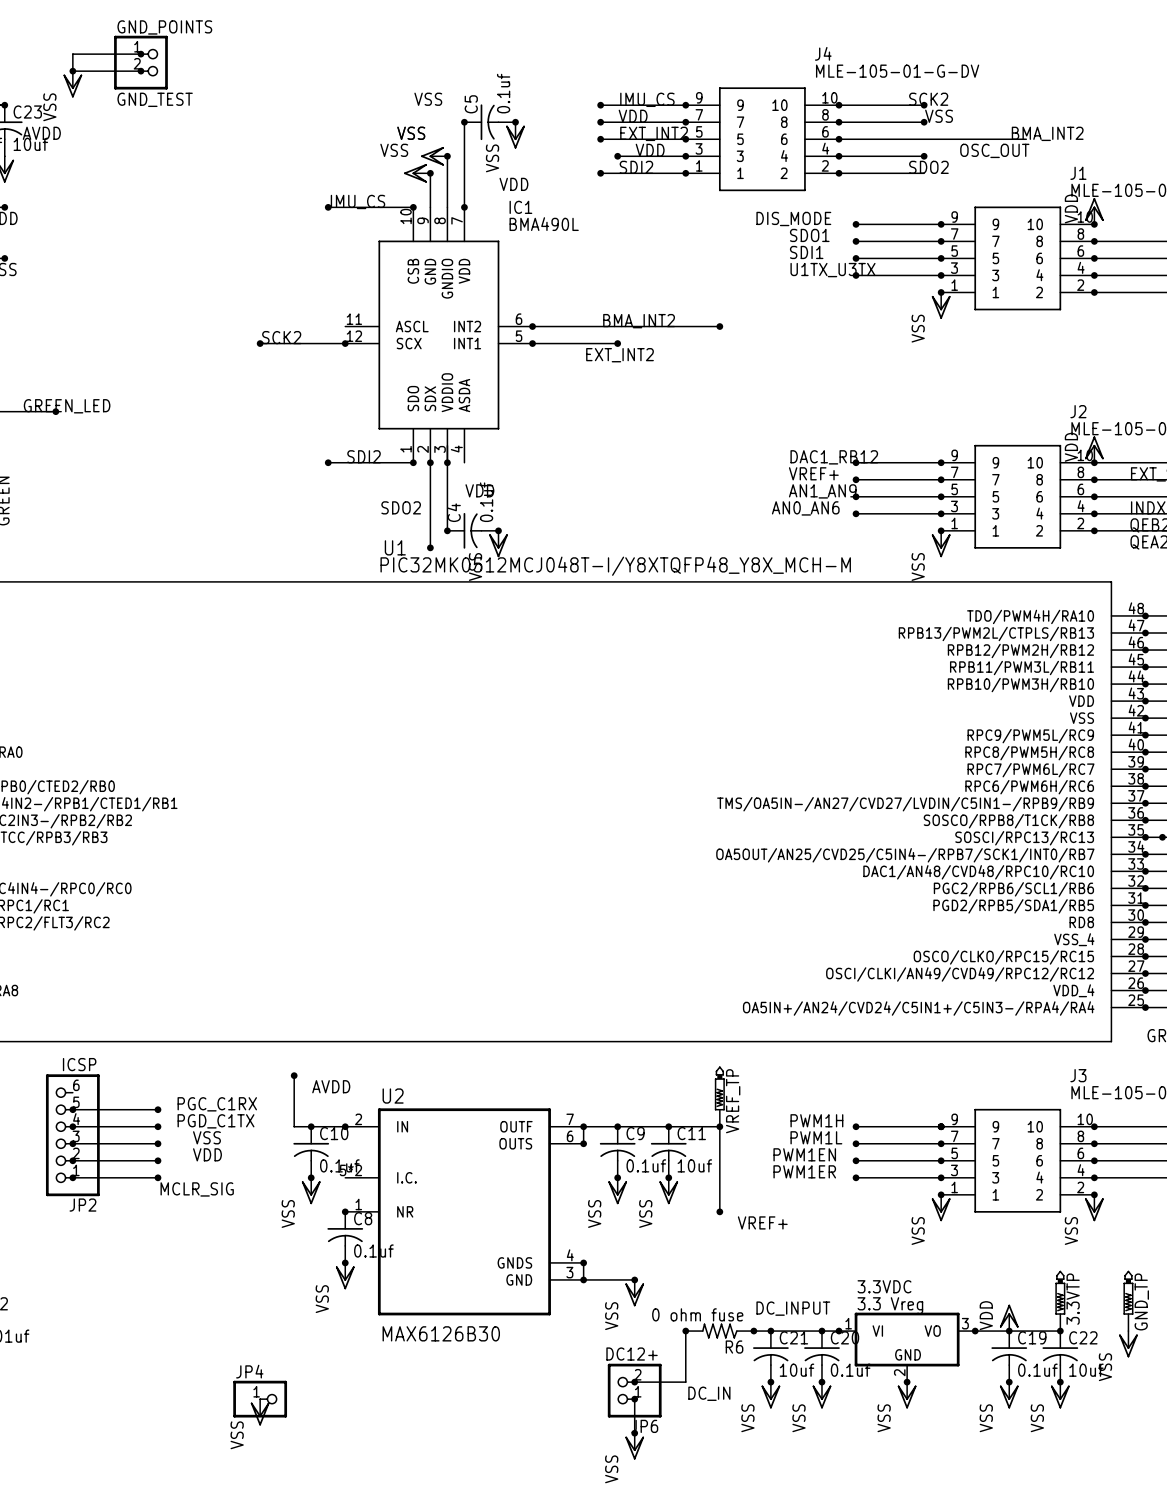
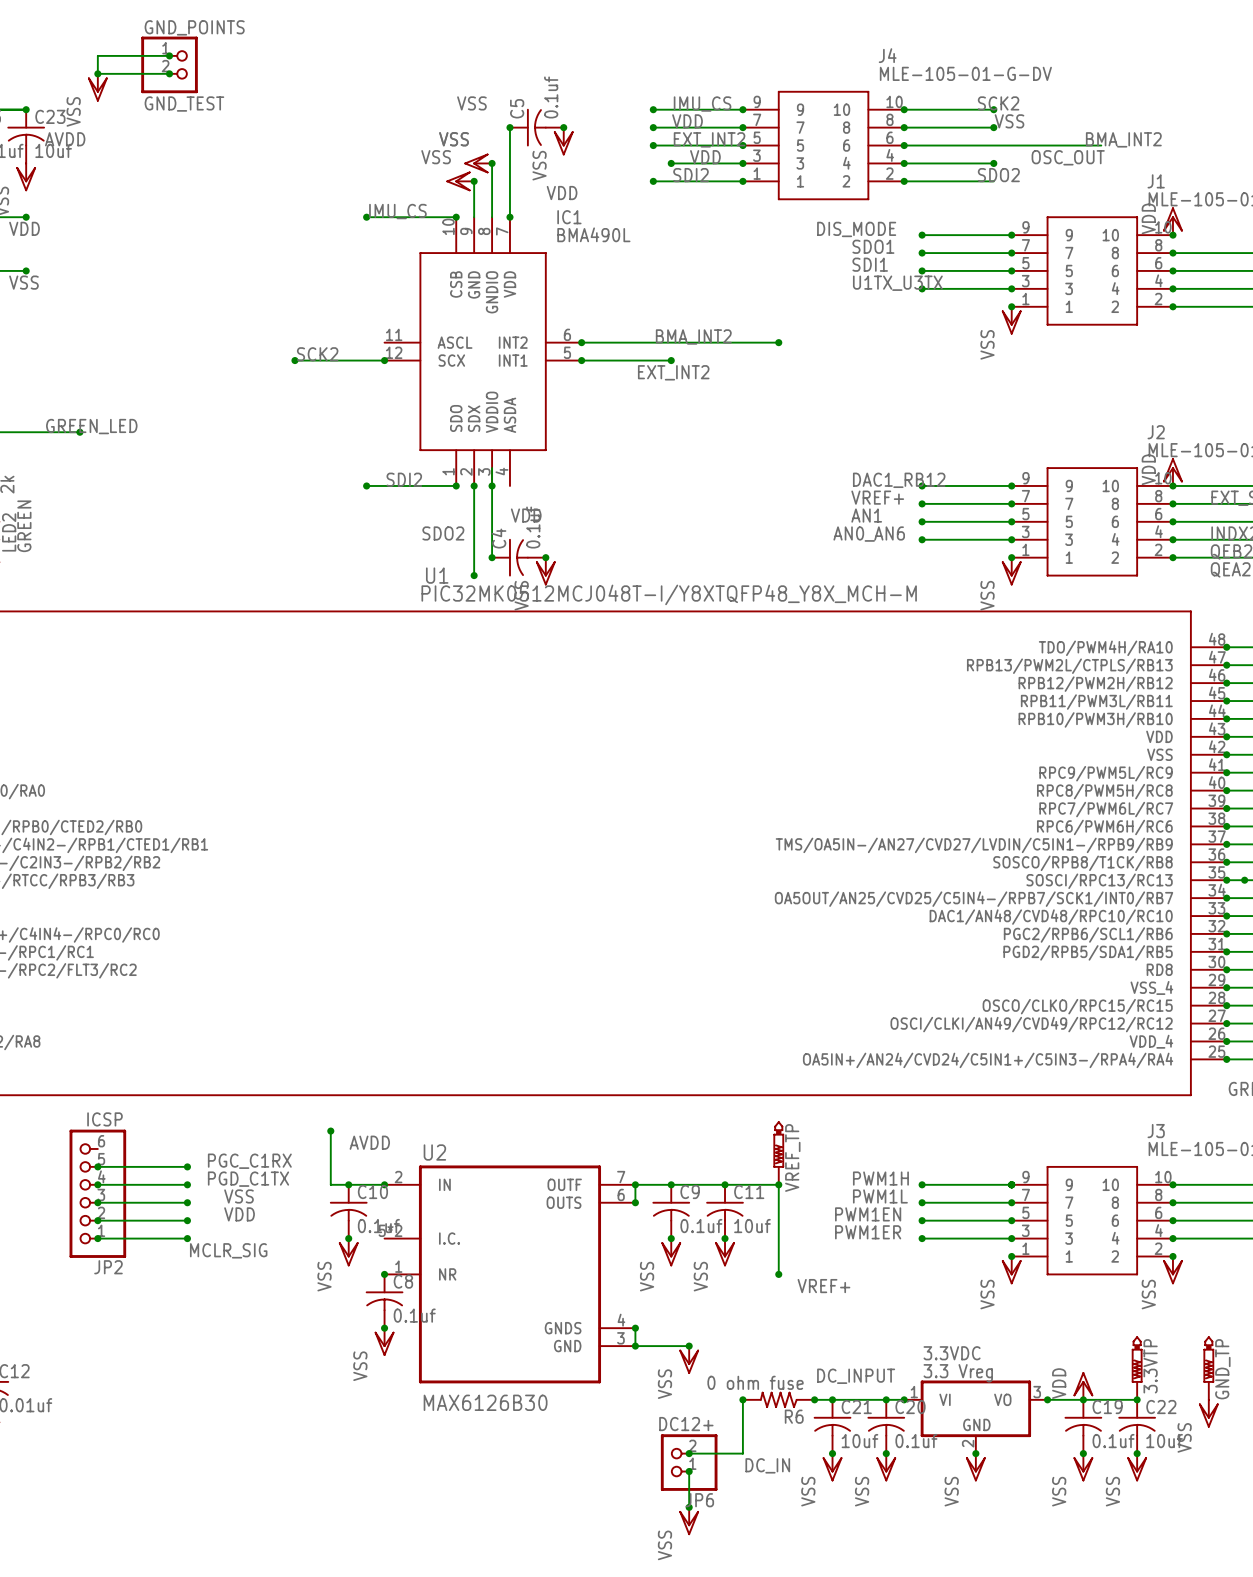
label: AN1_AN9 (822, 491) -> AN1 (866, 515)
JP4: (260, 1399) -> none
power symbol: VSS (260, 1412) -> none

